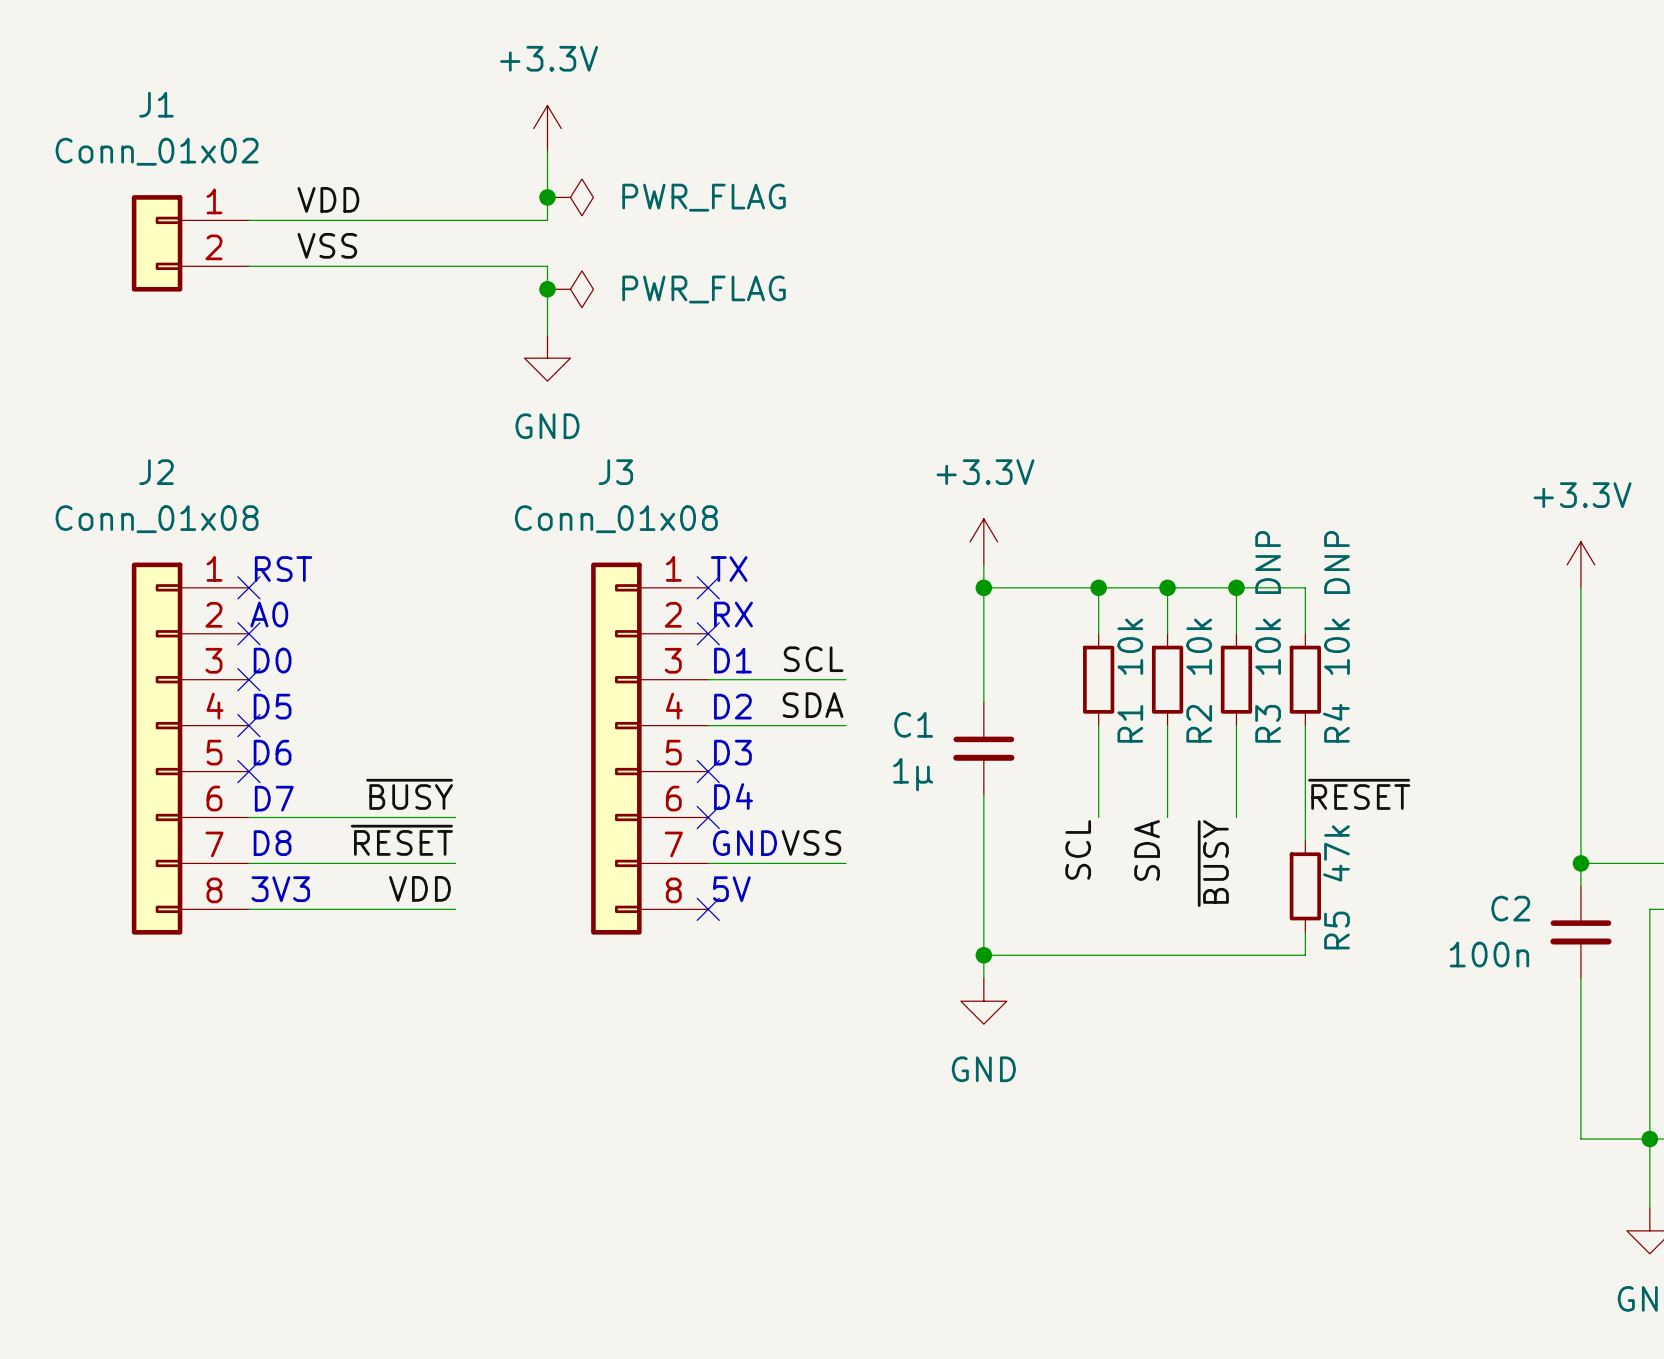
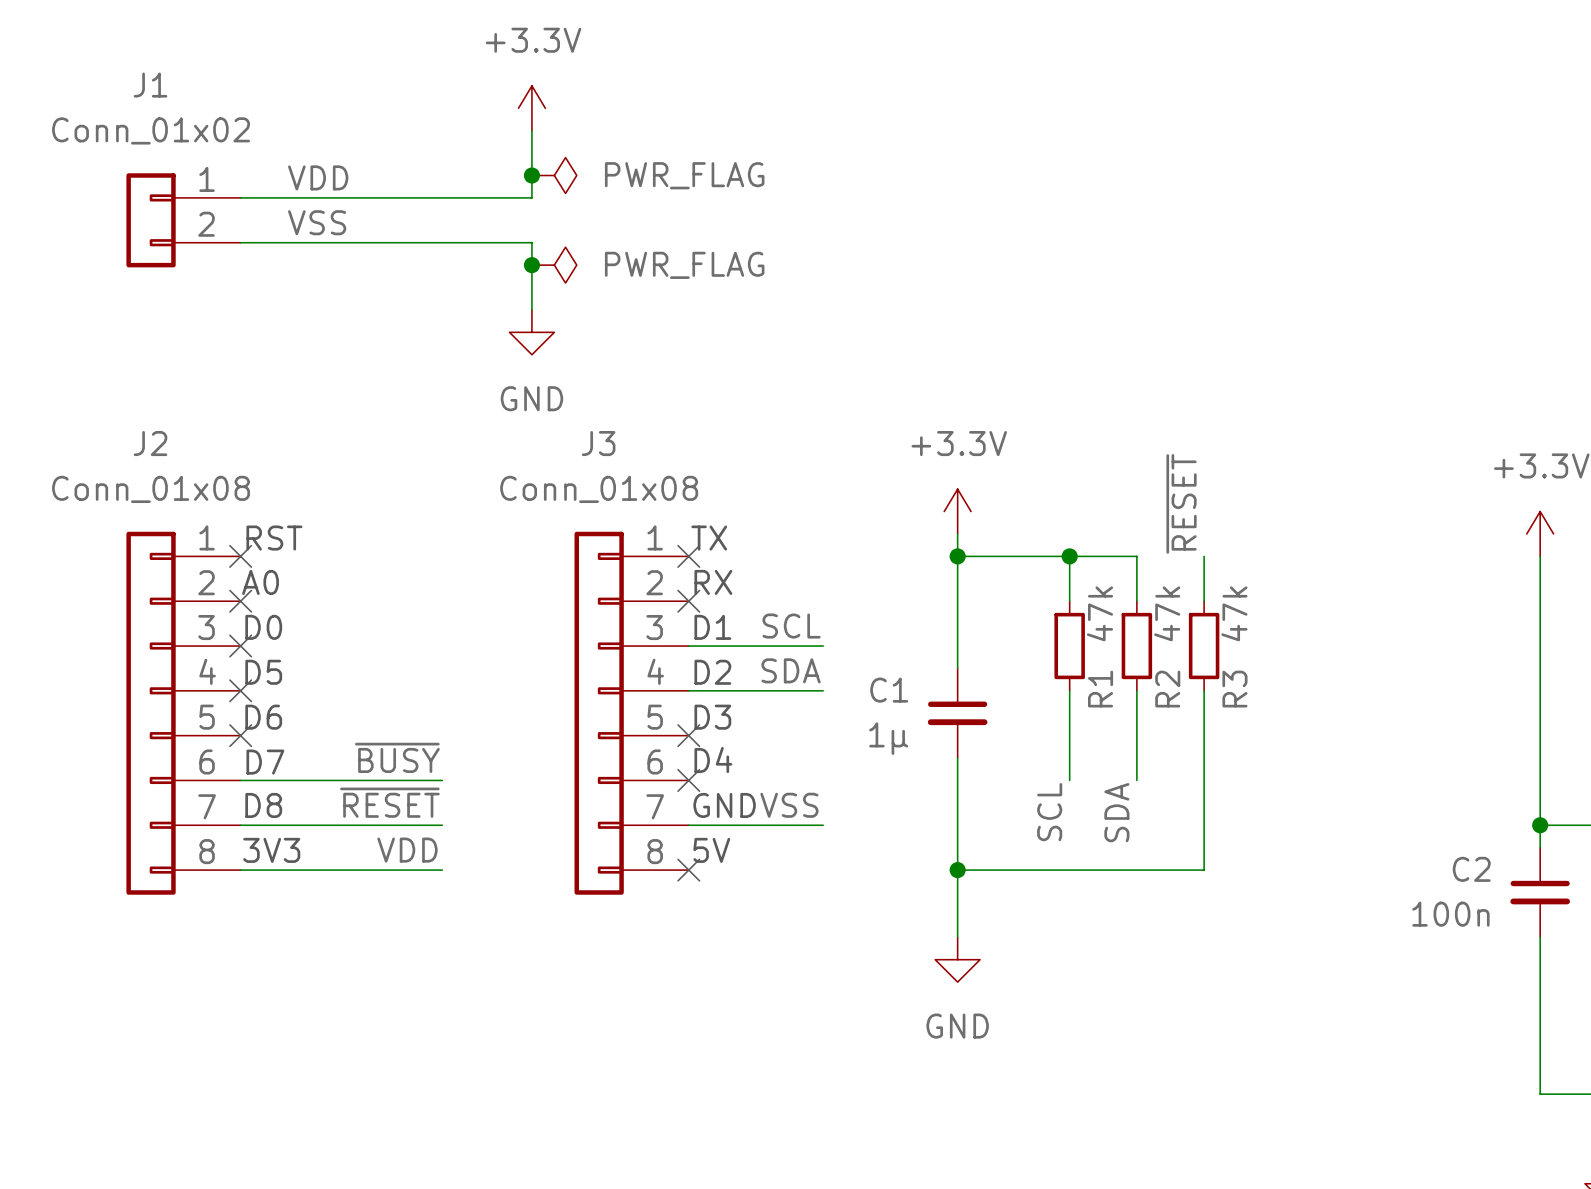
wire: (1167, 587) (1305, 587) (1305, 633) -> none
junction: (1167, 587) -> none
junction: (1236, 587) -> none
R3 value: 10k DNP (1268, 602) -> 47k (1234, 613)
R1 value: 10k (1130, 646) -> 47k (1100, 613)
R2 value: 10k (1199, 646) -> 47k (1167, 613)
R4: 10k DNP (1305, 679) -> none
wire: (1305, 725) (1305, 840) -> none
label rotation: 0° (1359, 794) -> 90° counterclockwise (1181, 503)
label position: ~{RESET} (1359, 794) -> ~{RESET} (1181, 503)
wire: none -> (1204, 780) (1204, 870) (957, 870)
label: ~{BUSY} (1213, 863) -> none
R5: 47k (1305, 886) -> none
wire: (1305, 932) (1305, 955) (983, 955) -> none
junction position: (983, 955) -> (957, 870)

